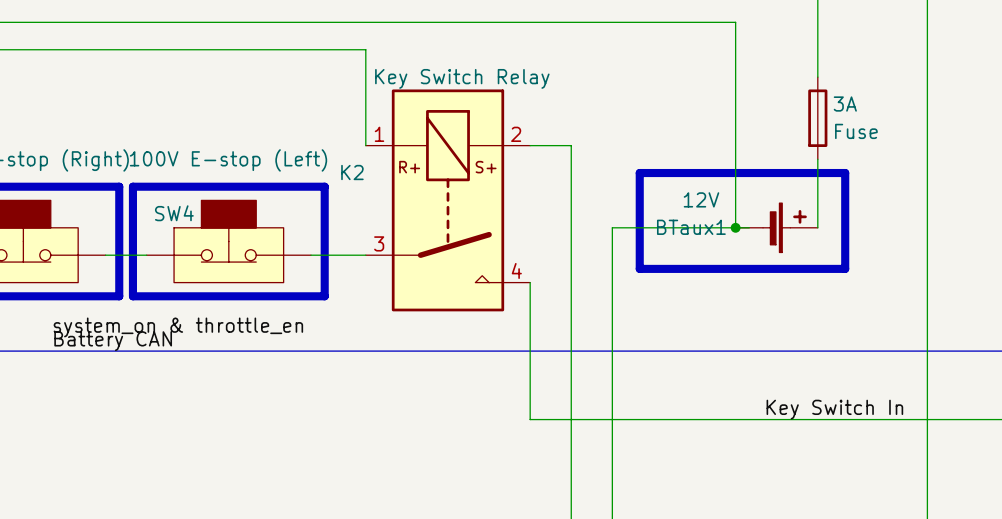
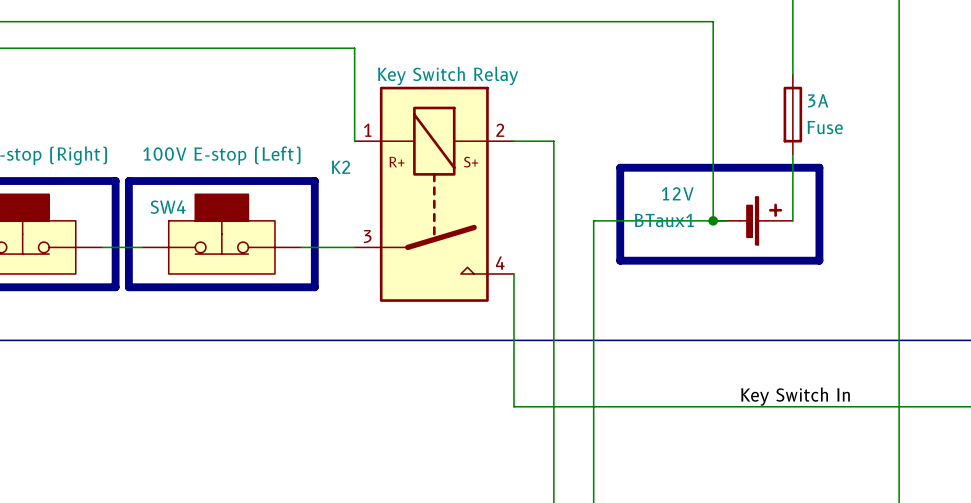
label: system_on & throttle_en (178, 327) -> none
label: Battery CAN (113, 341) -> none

